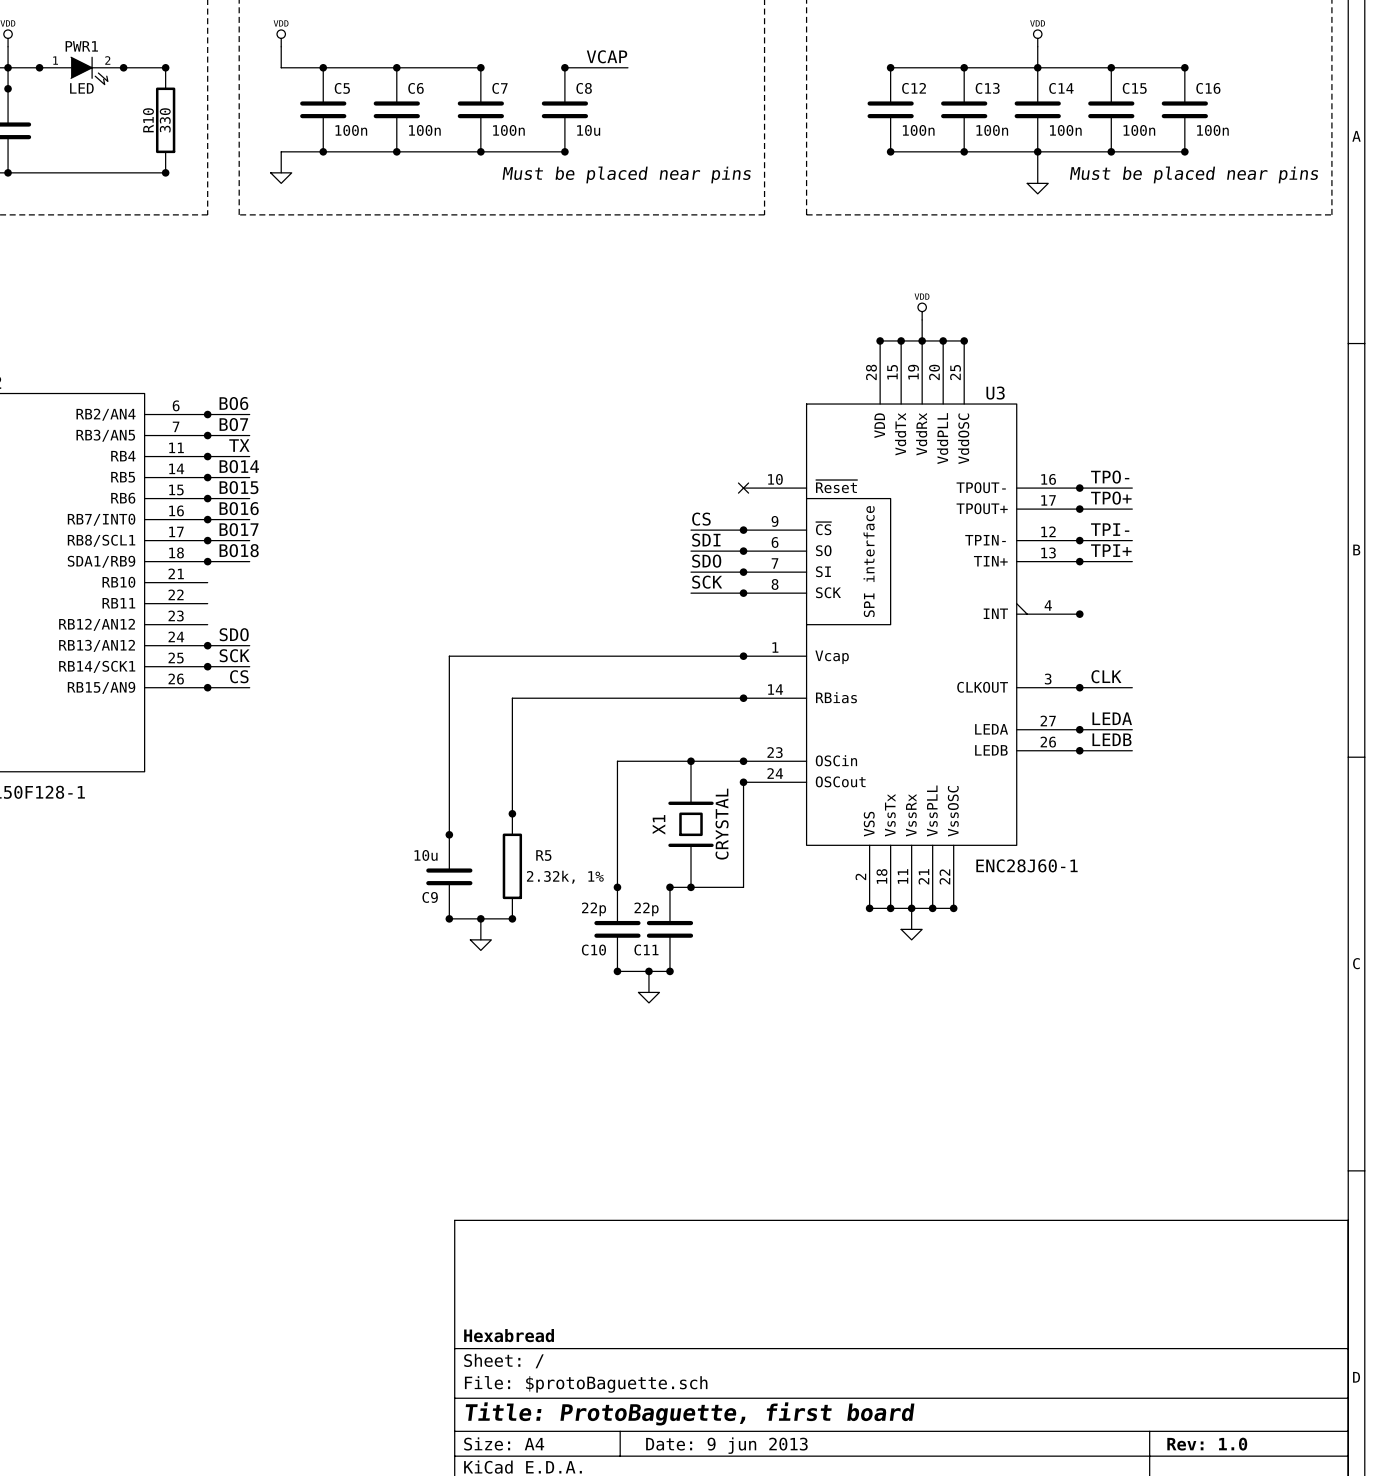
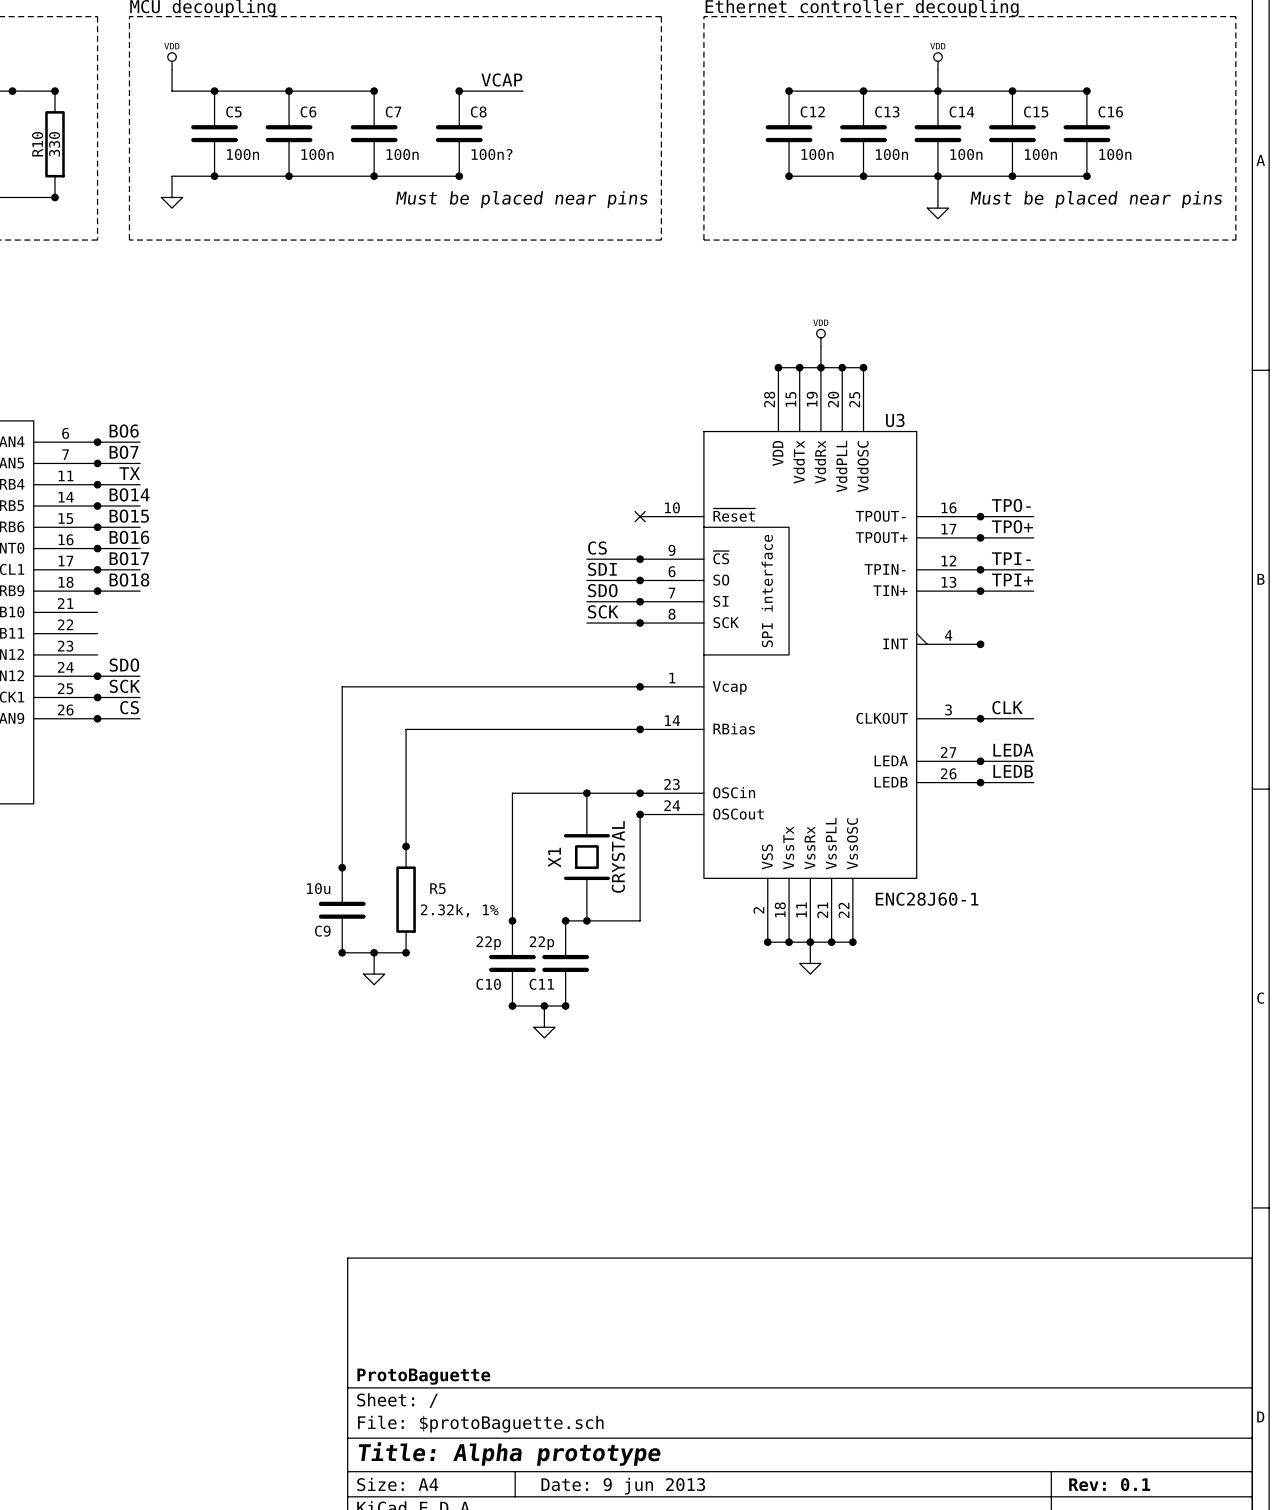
C8 value: 10u (588, 130) -> 100n? (492, 154)
title block: Hexabread (509, 1335) -> ProtoBaguette (423, 1376)
title block: Title: ProtoBaguette, first board (690, 1413) -> Title: Alpha prototype (509, 1454)
title block: Rev: 1.0 (1207, 1444) -> Rev: 0.1 (1109, 1484)

